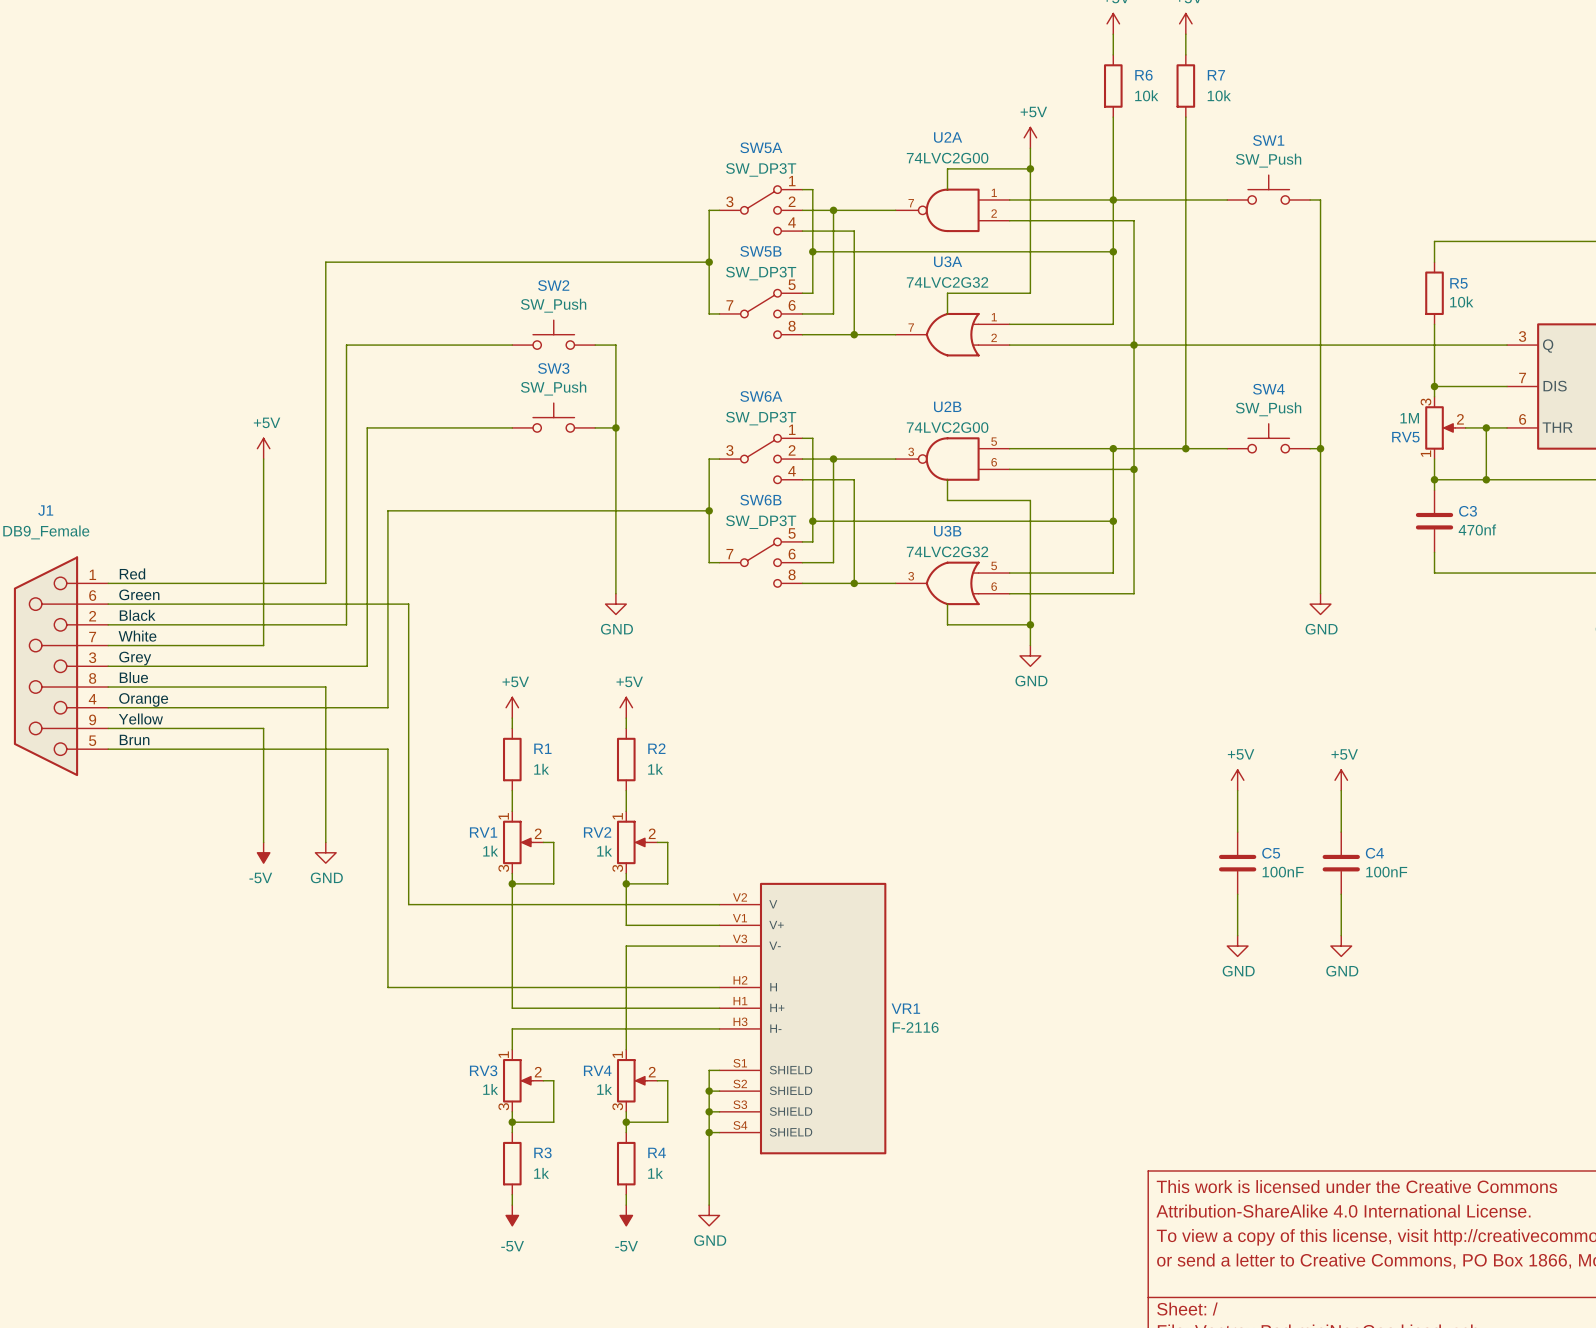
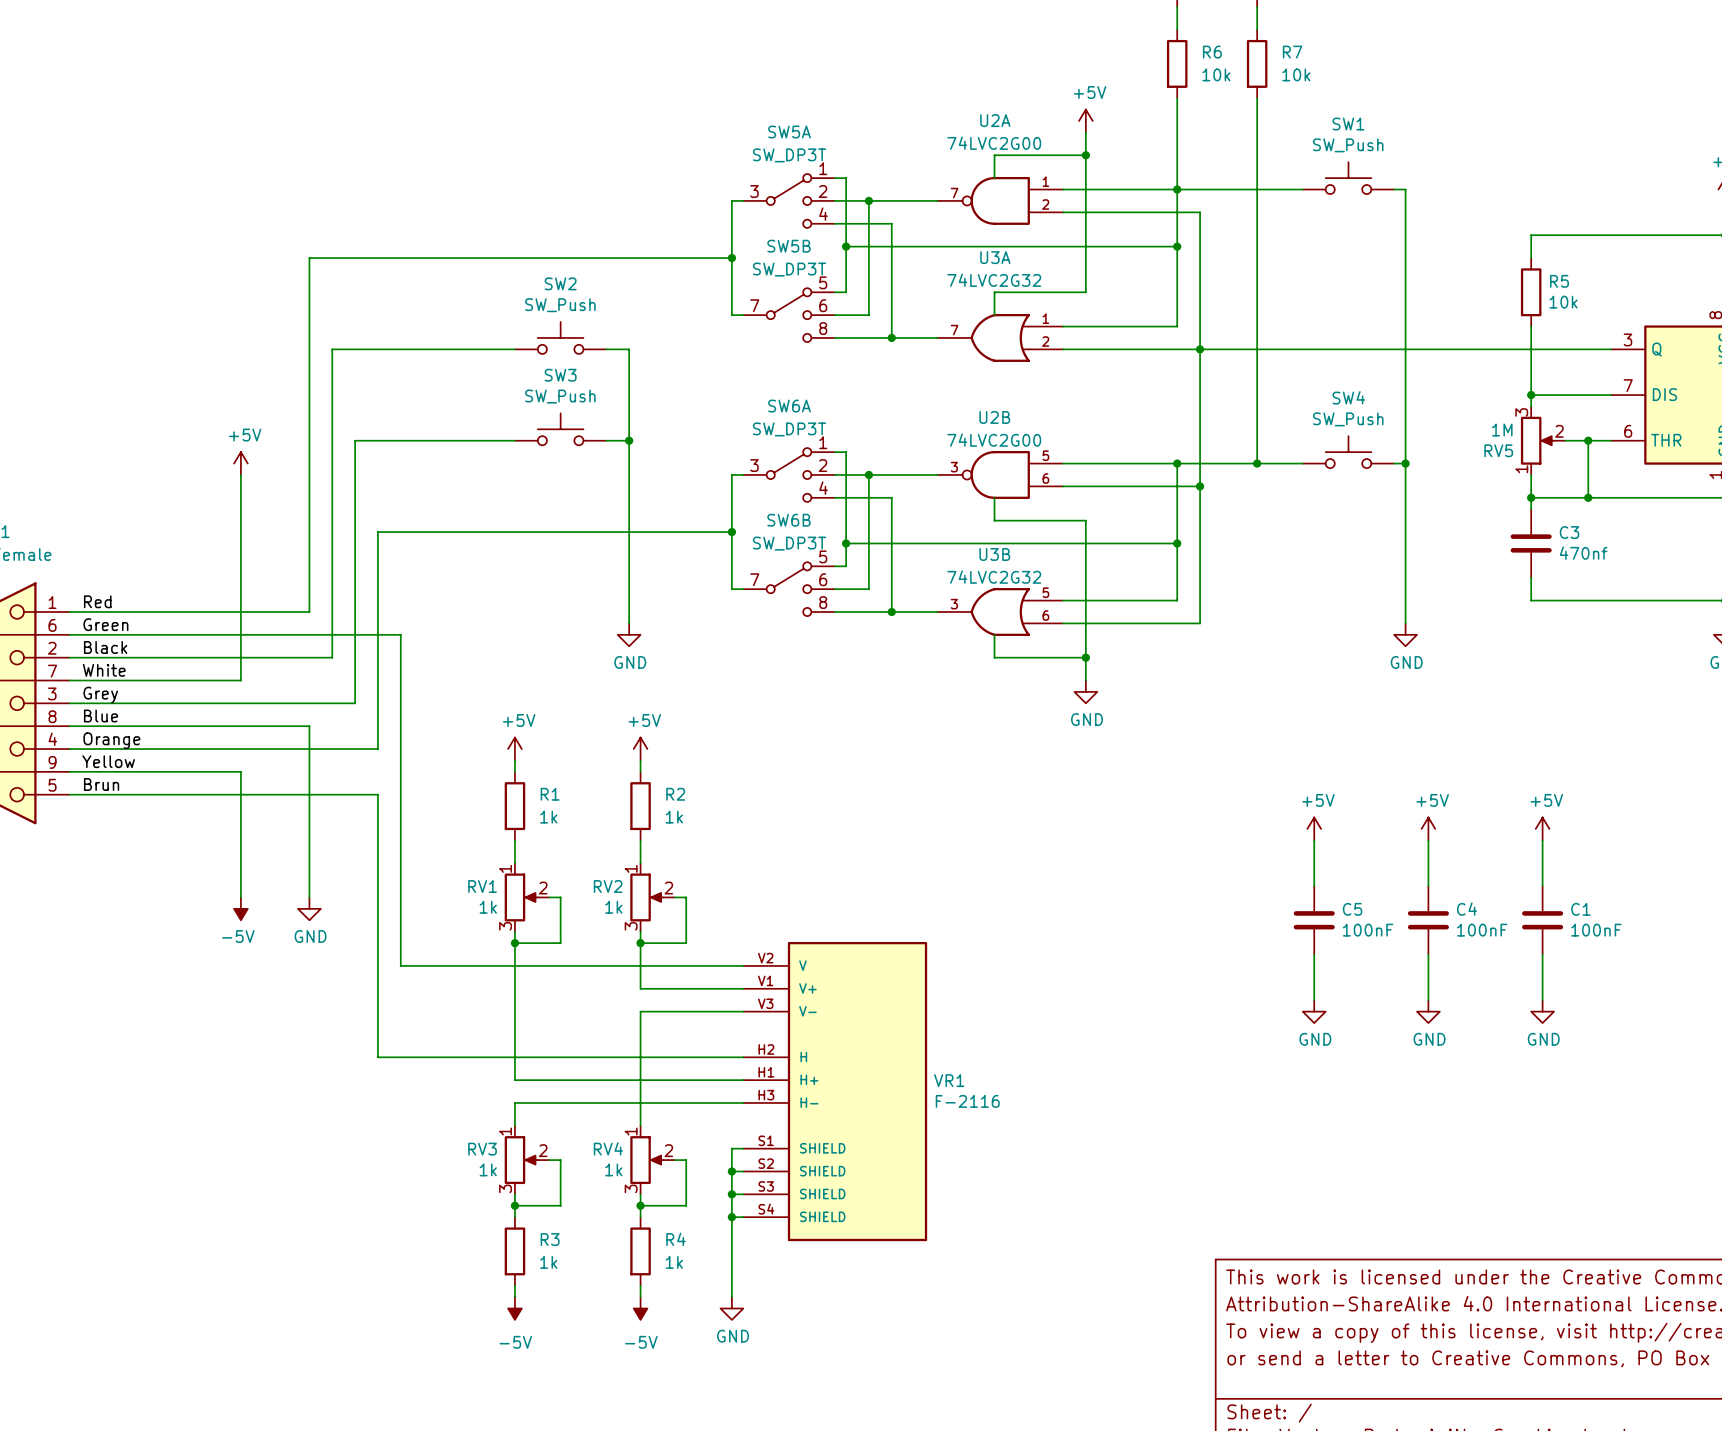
power symbol: none -> +5V (1542, 828)
wire: none -> (1542, 840) (1542, 886)
C1: none -> 100nF (1542, 920)
wire: none -> (1542, 954) (1542, 1000)
power symbol: none -> GND (1542, 1011)

